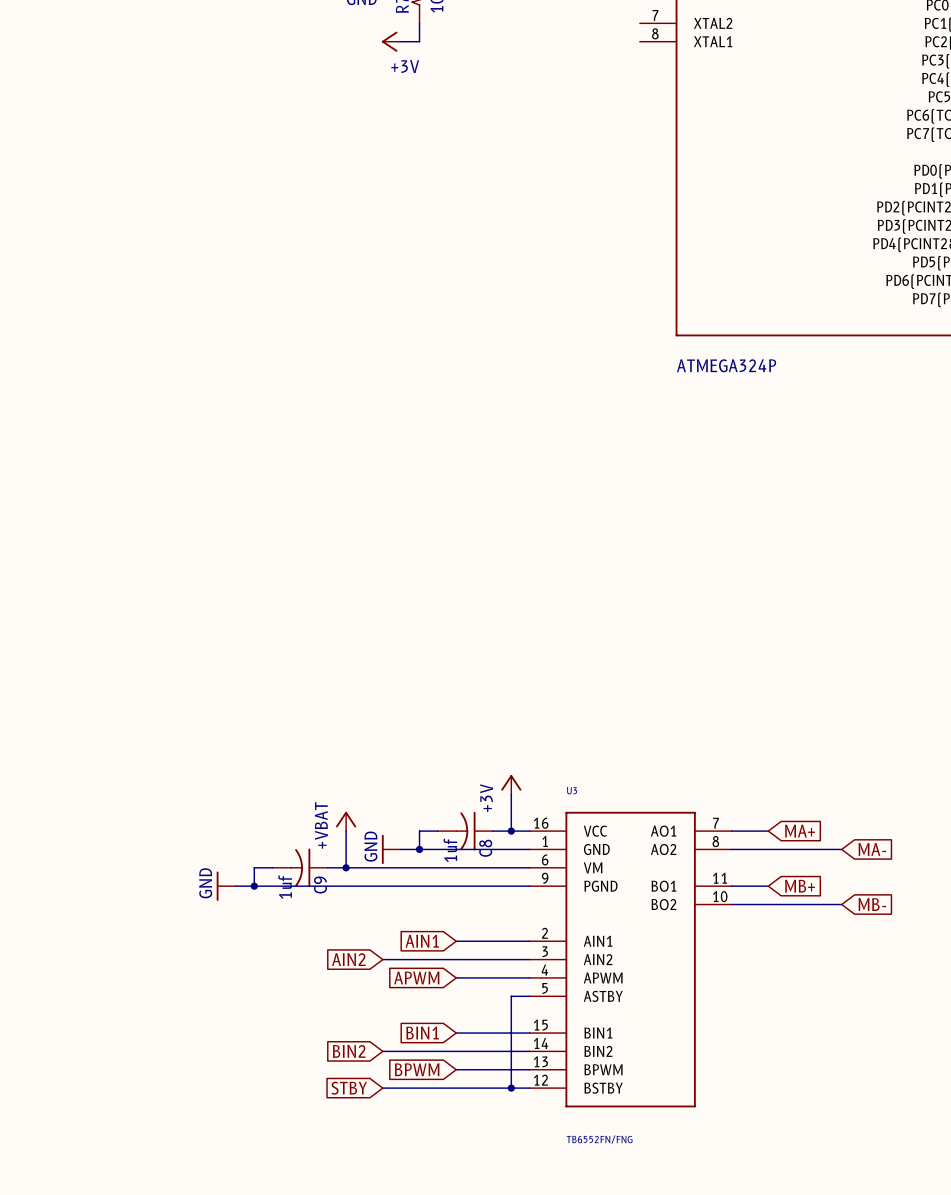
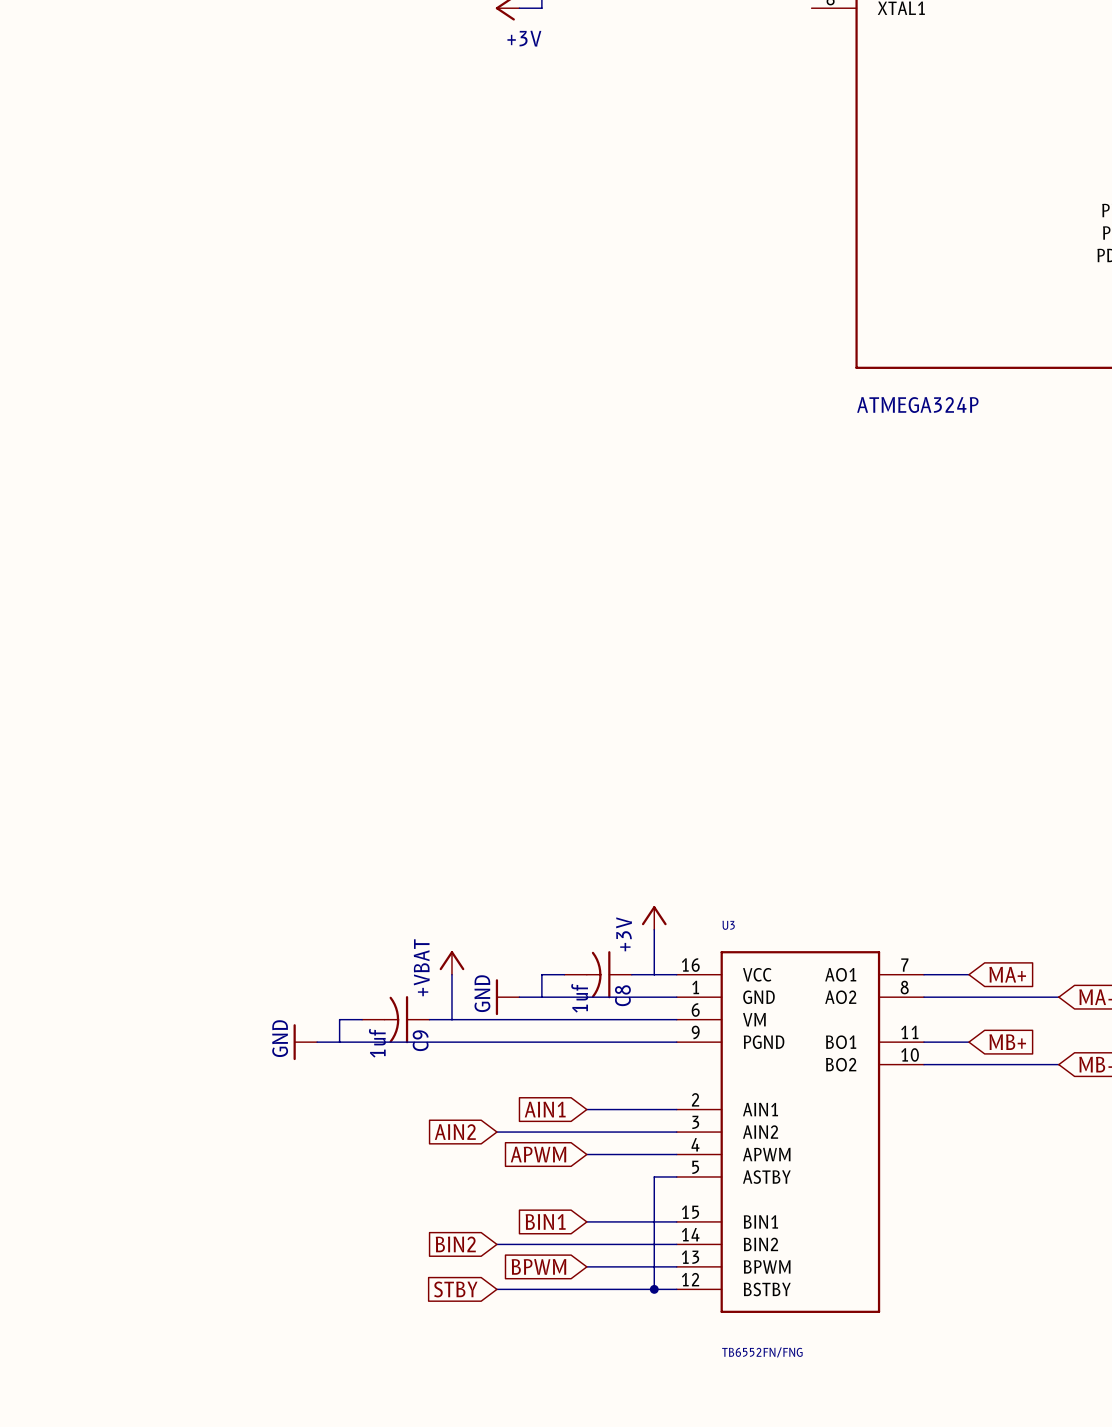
junction: (511, 831) -> none
junction: (419, 849) -> none
junction: (346, 867) -> none
junction: (254, 886) -> none

